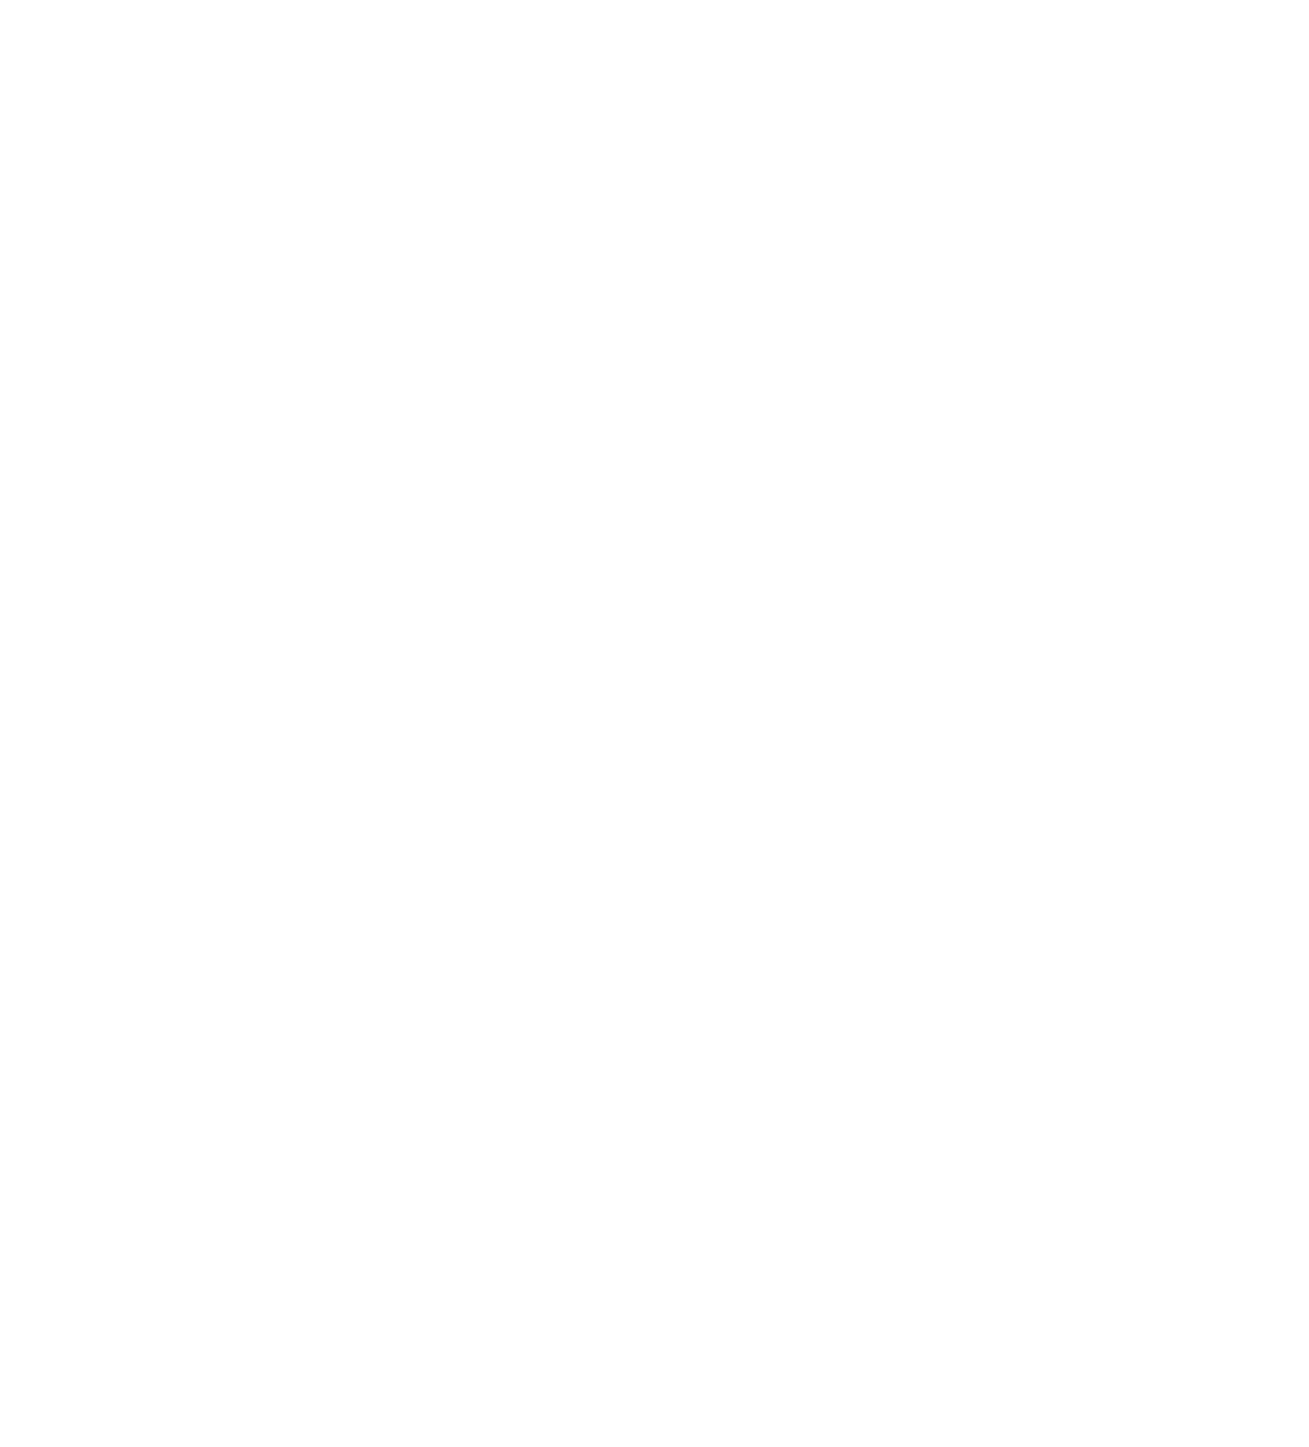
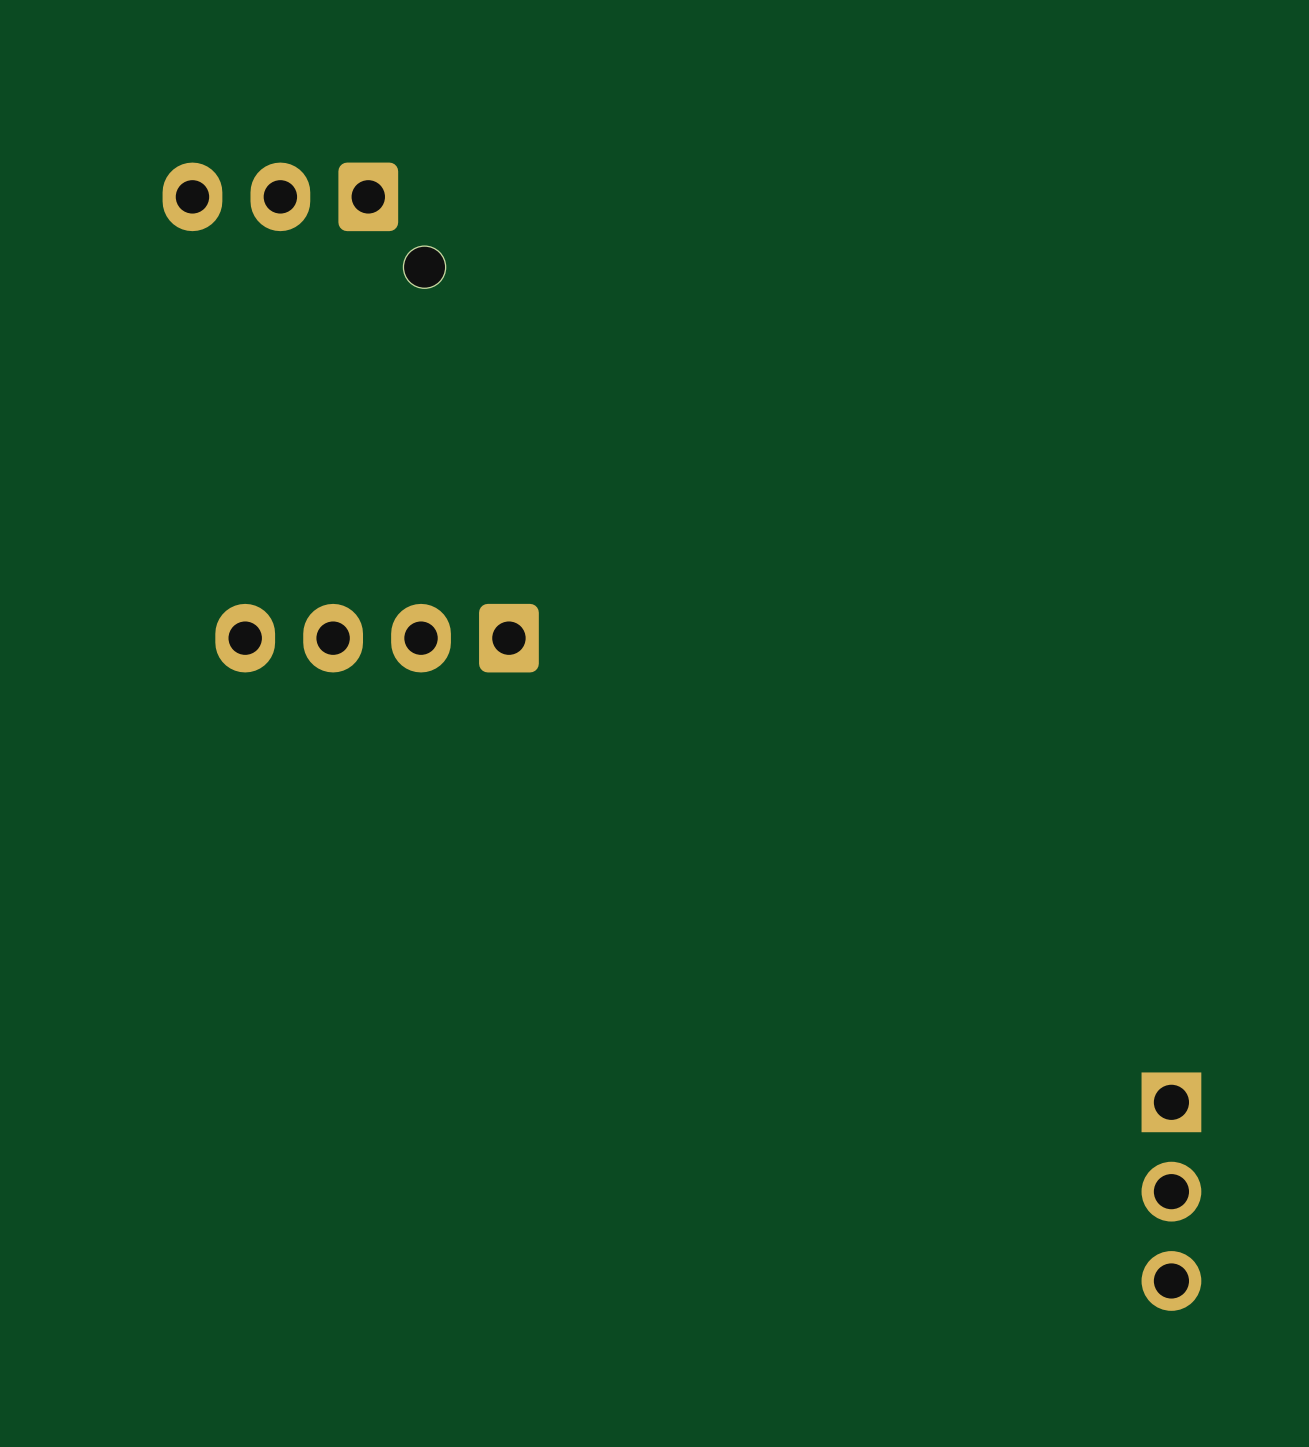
part: none -> (304, 225)
part: none -> (377, 638)
part: none -> (1171, 1191)

